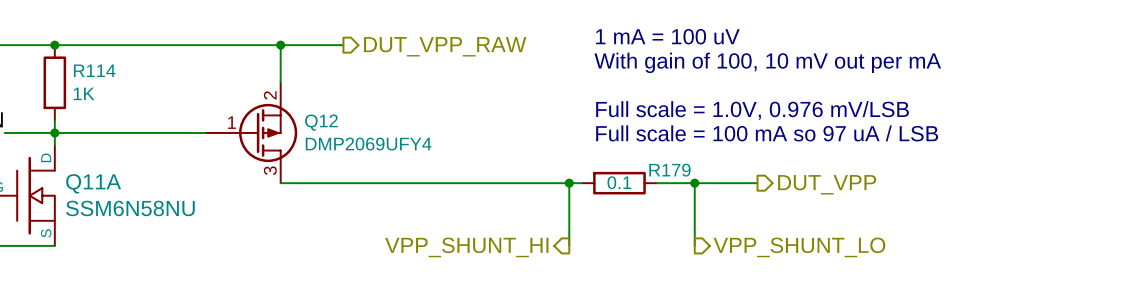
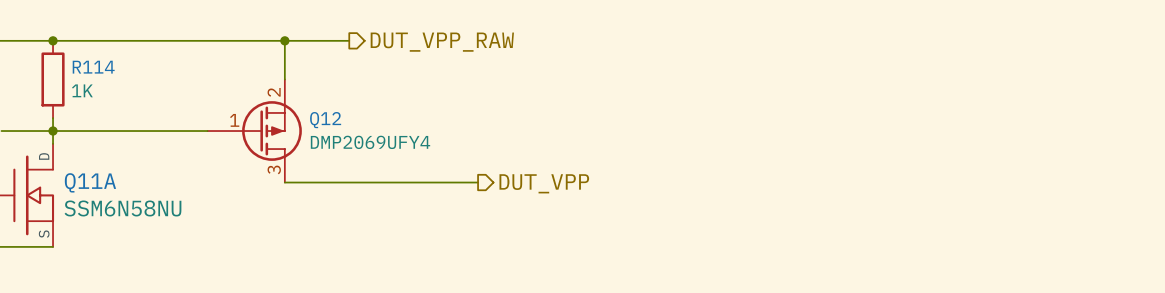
text: 1 mA = 100 uV (667, 36) -> none
text: With gain of 100, 10 mV out per mA (767, 62) -> none
text: Full scale = 1.0V, 0.976 mV/LSB (752, 110) -> none
text: Full scale = 100 mA so 97 uA / LSB (767, 133) -> none
wire: (468, 183) (581, 183) -> none
wire: (569, 183) (569, 245) -> none
junction: (569, 183) -> none
R179: 0.1 (619, 183) -> none
wire: (657, 183) (757, 183) -> none
wire: (694, 183) (694, 245) -> none
junction: (694, 183) -> none
hierarchical label: none -> DUT_VPP (544, 183)
hierarchical label: DUT_VPP (827, 184) -> none
hierarchical label: VPP_SHUNT_HI (466, 247) -> none
hierarchical label: VPP_SHUNT_LO (799, 247) -> none

